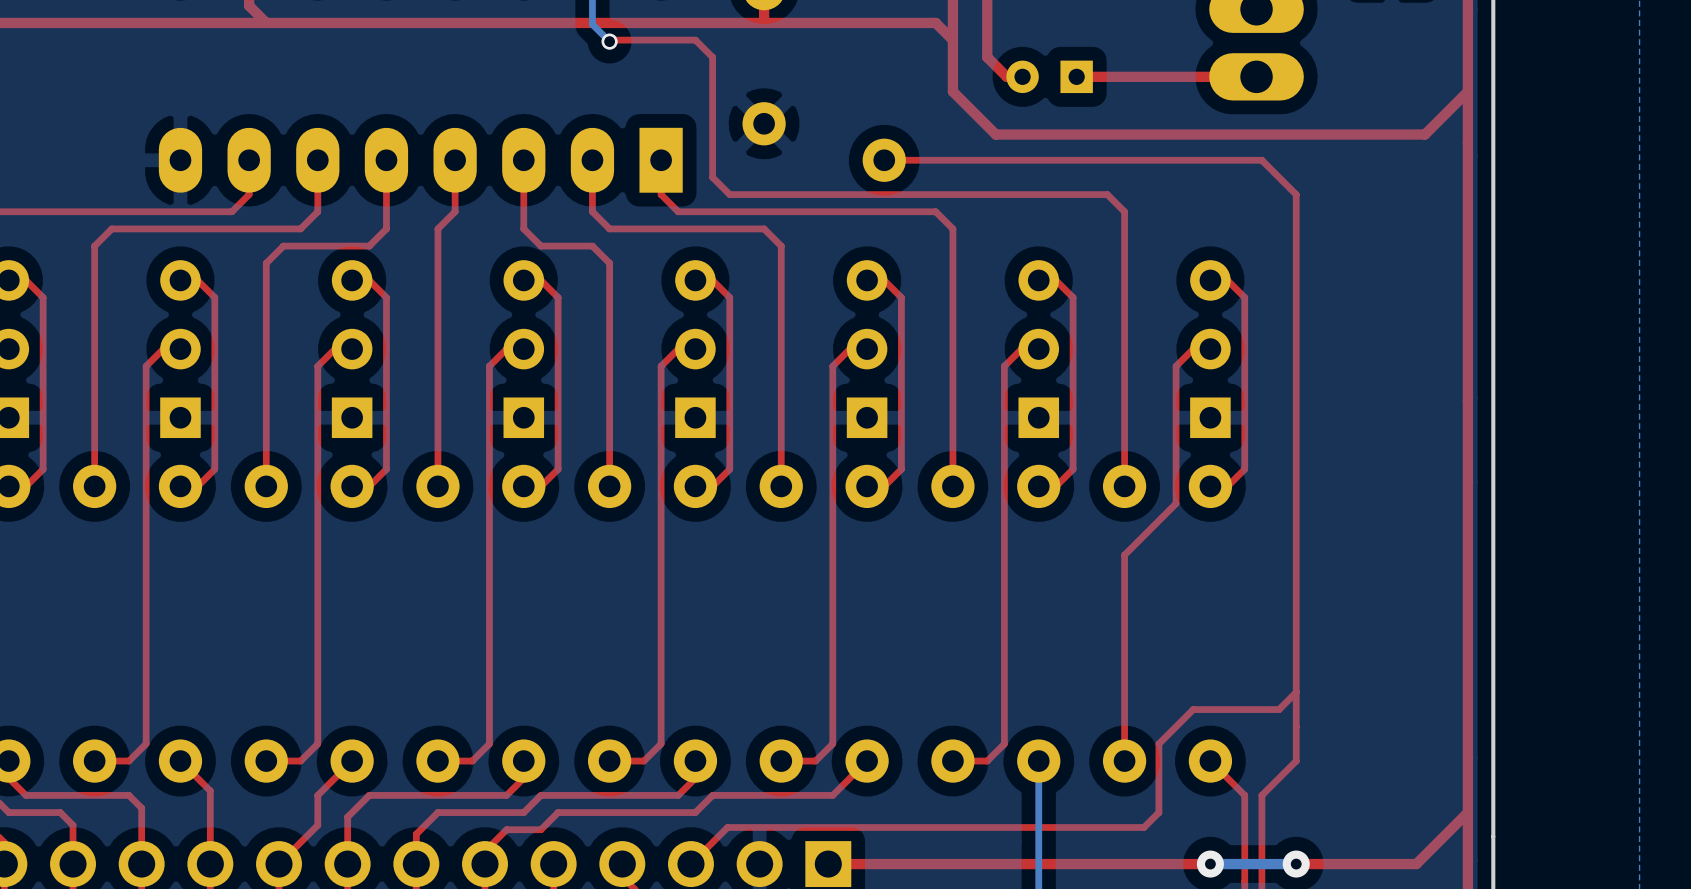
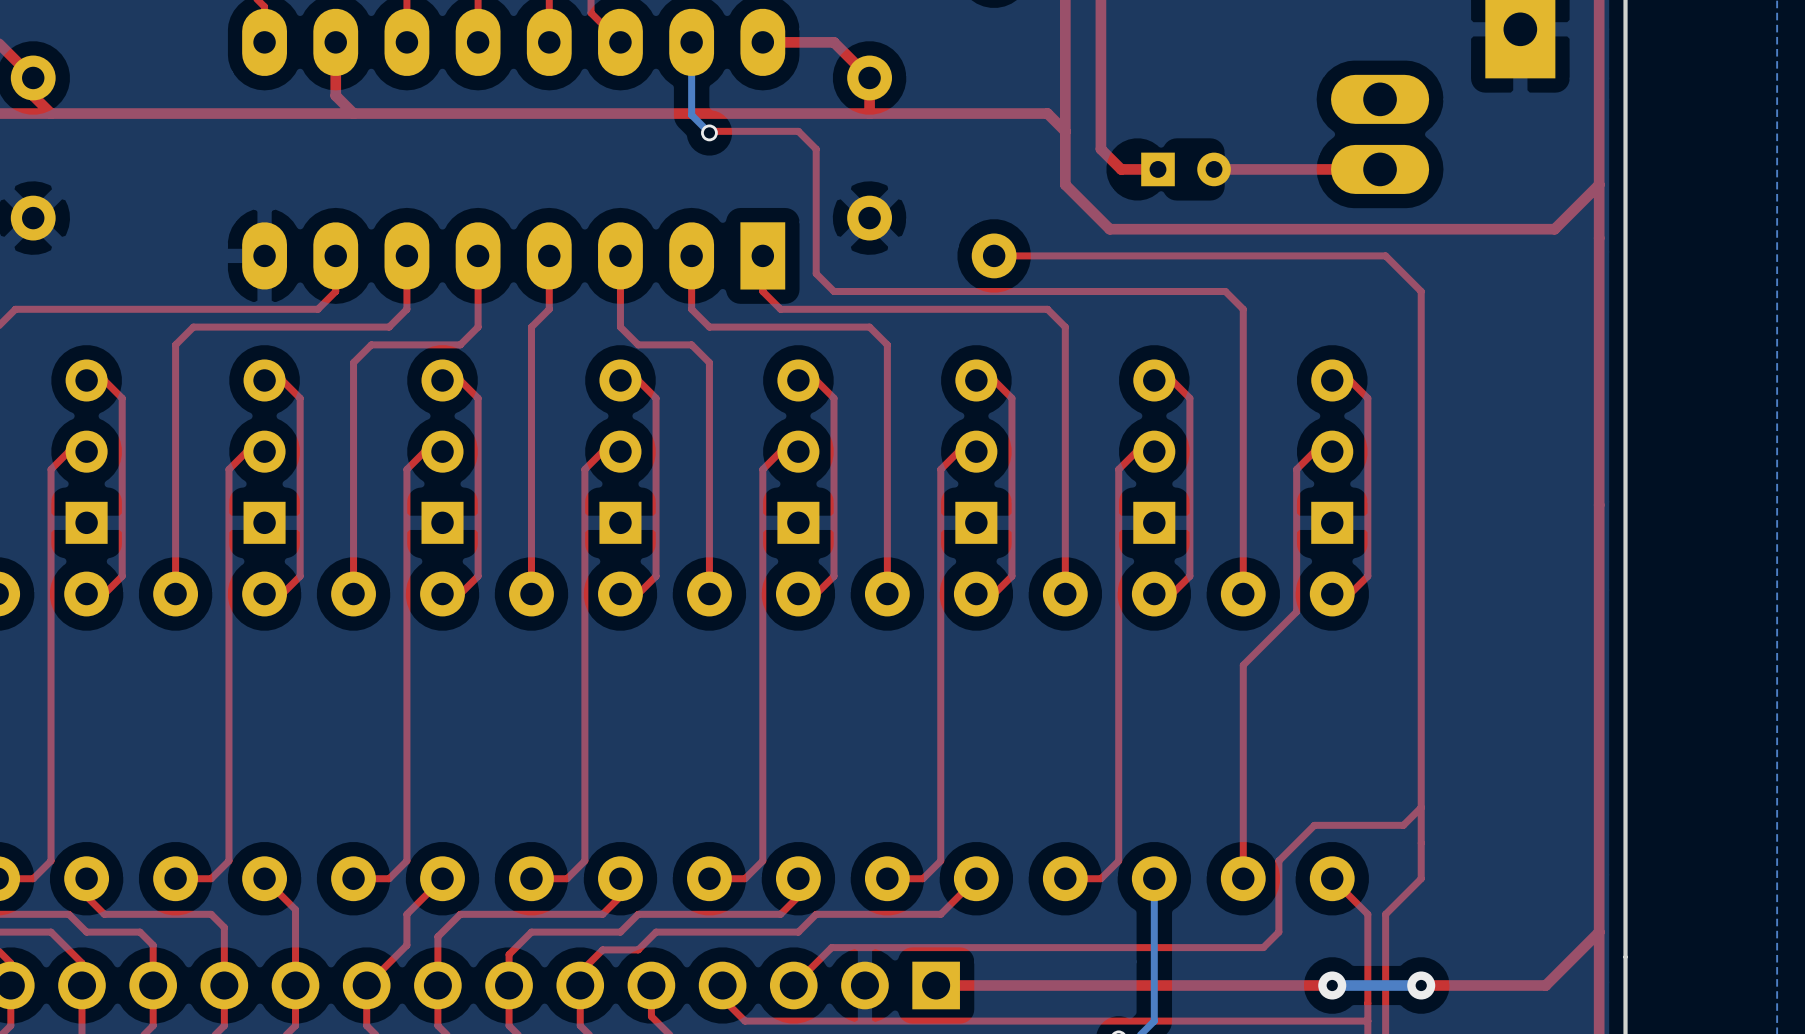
part rotation: 0° (1049, 76) -> 180° (1186, 169)

